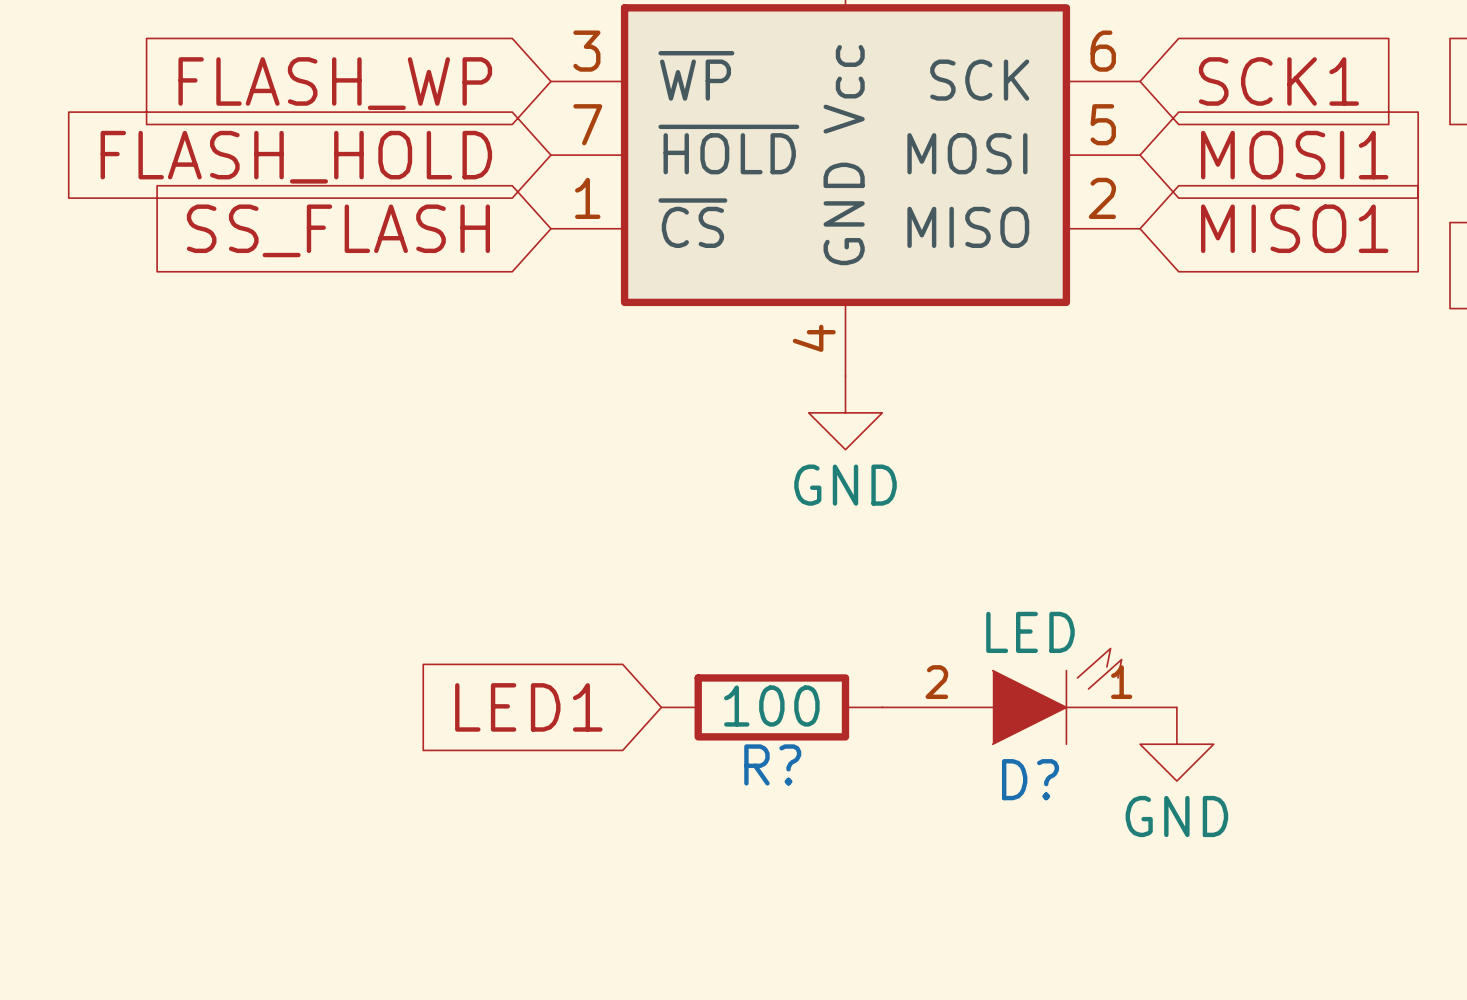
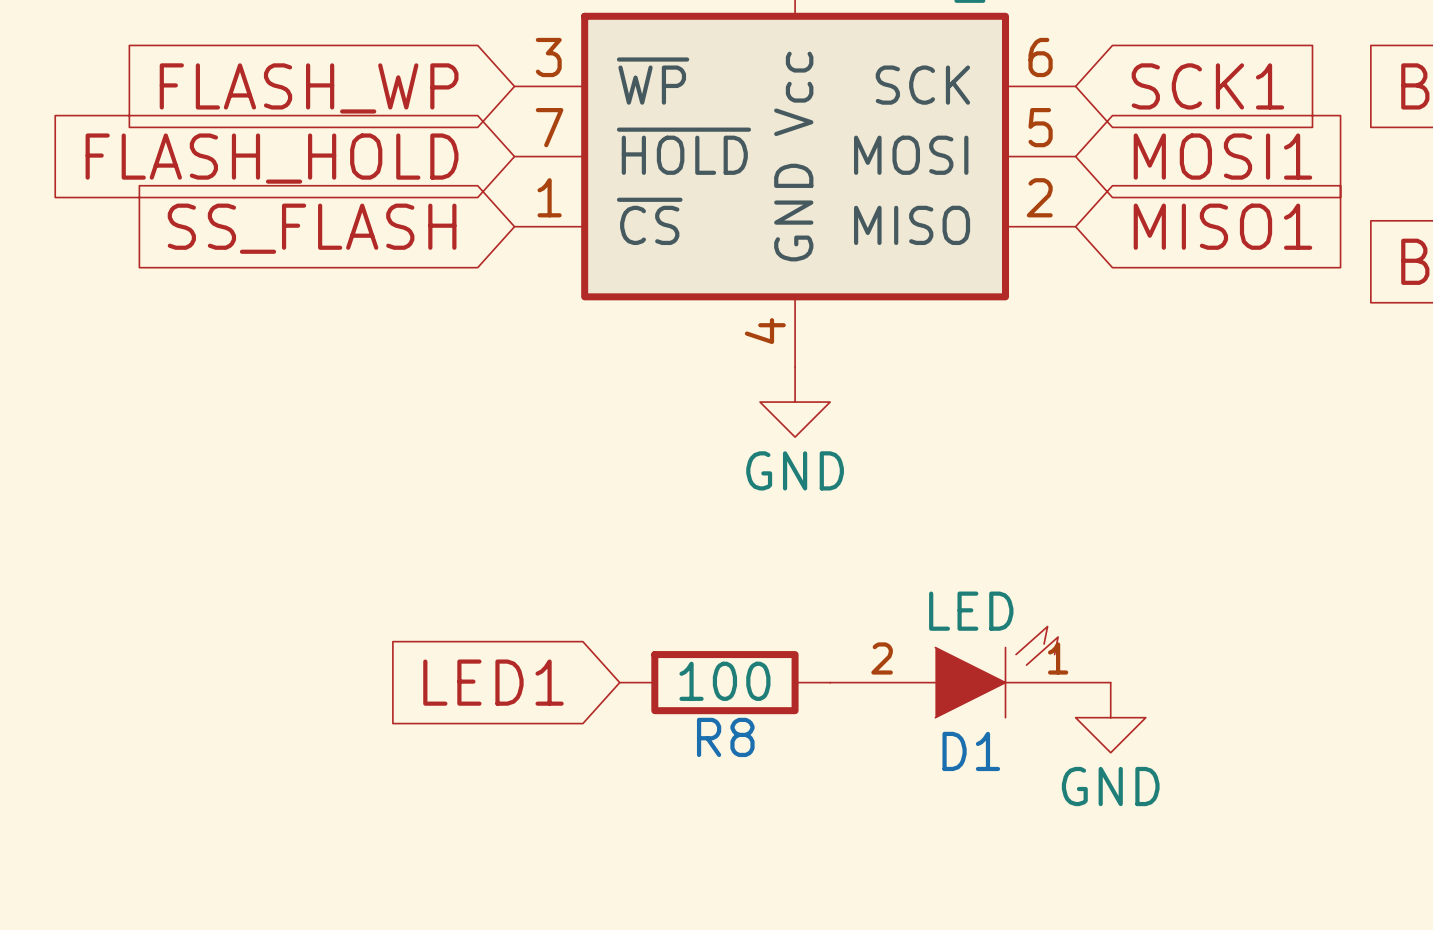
R? name: R? (772, 764) -> R8 (725, 737)
D? name: D? (1030, 779) -> D1 (971, 751)

